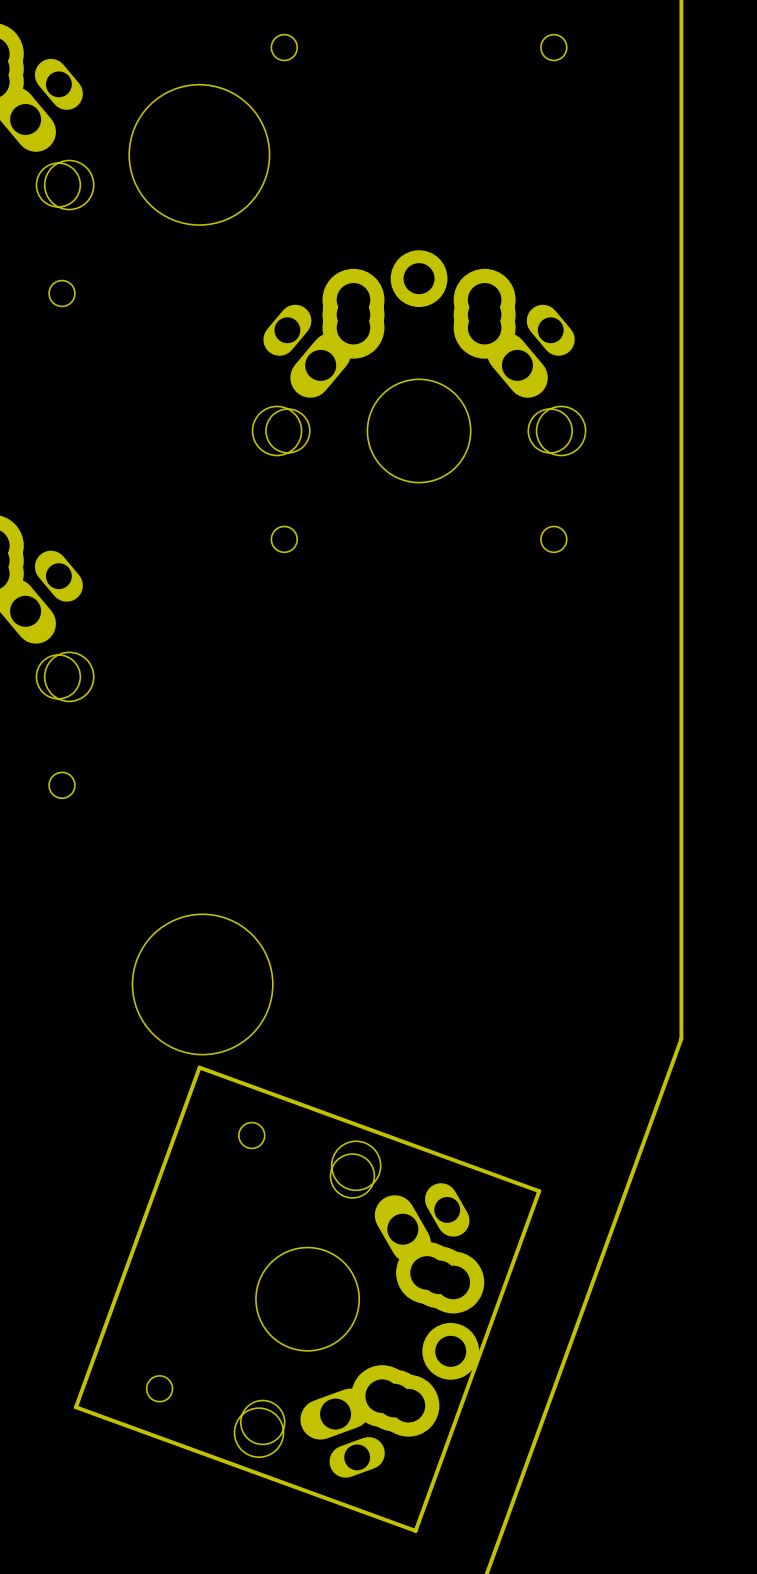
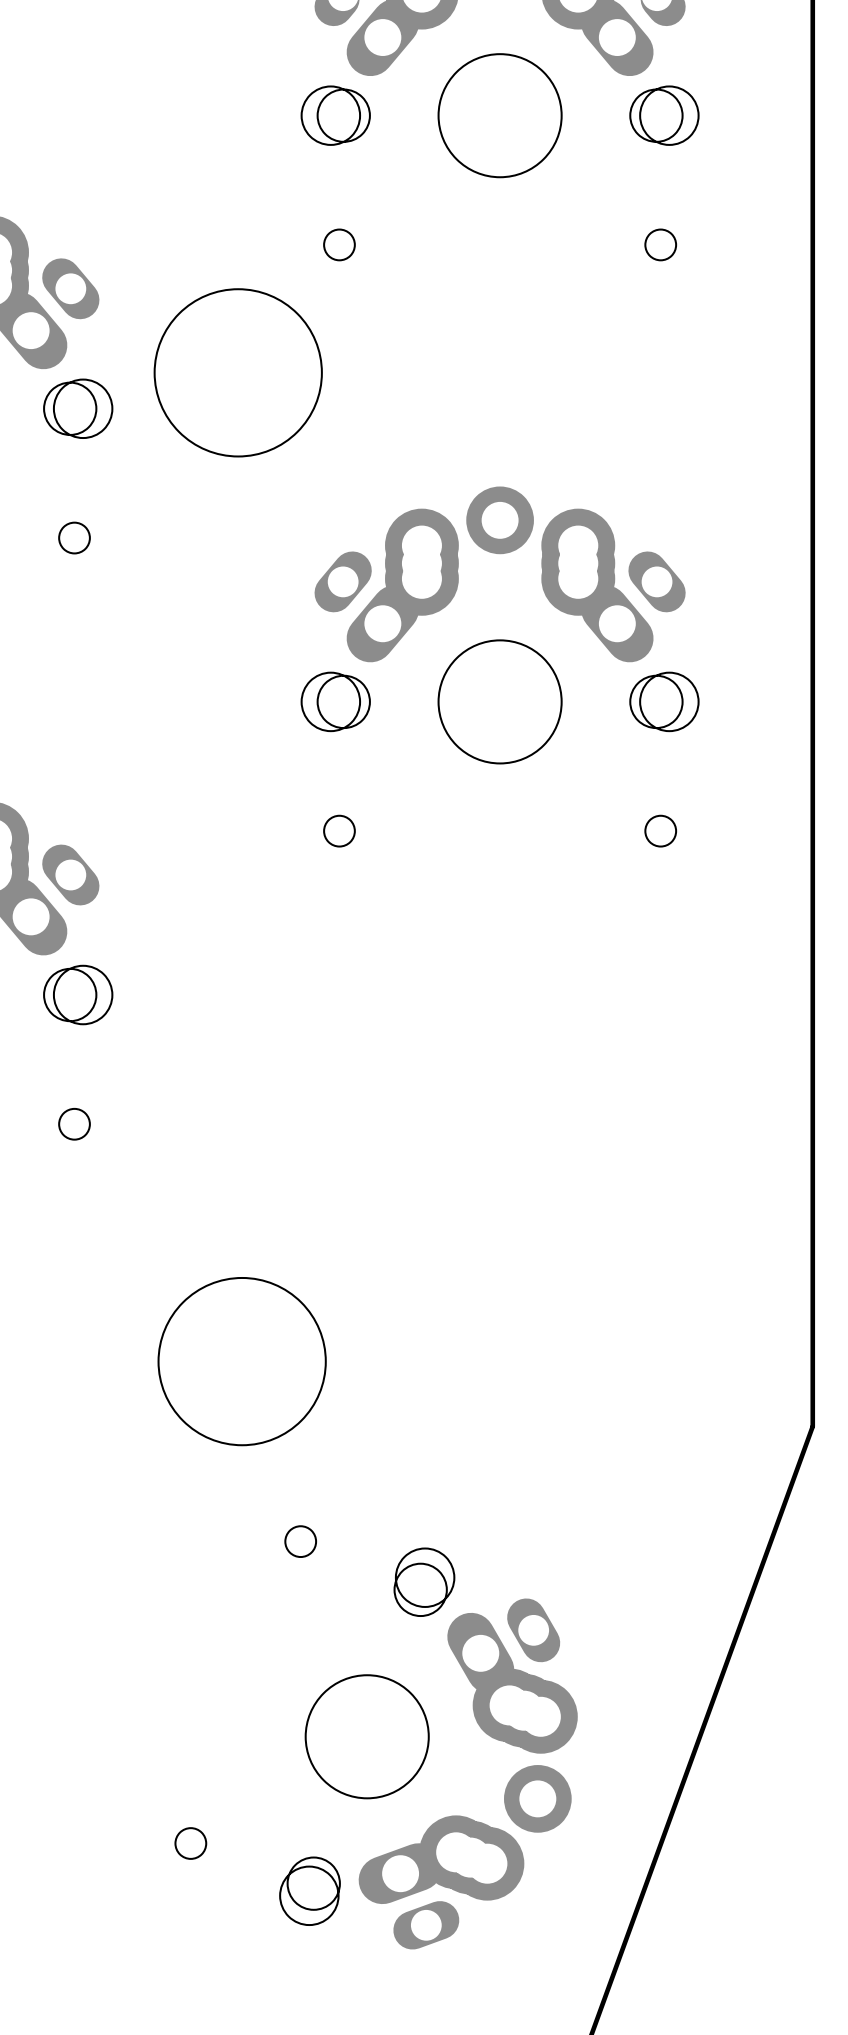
board edge: (199, 1067) (539, 1191) (415, 1530) (75, 1407) (199, 1067) -> none

